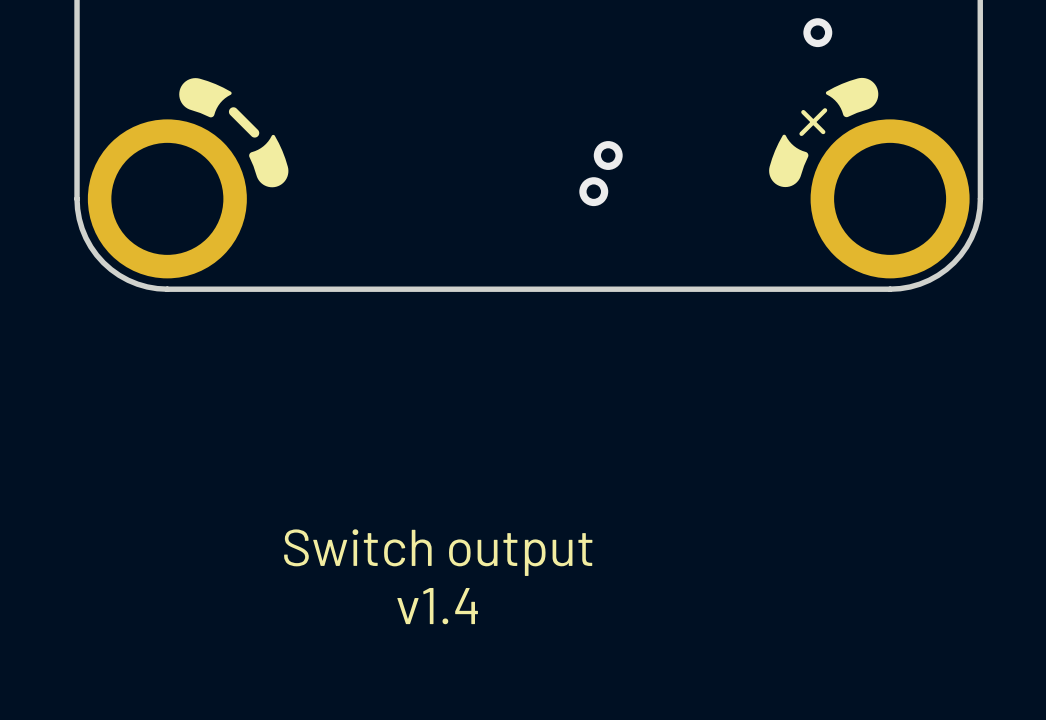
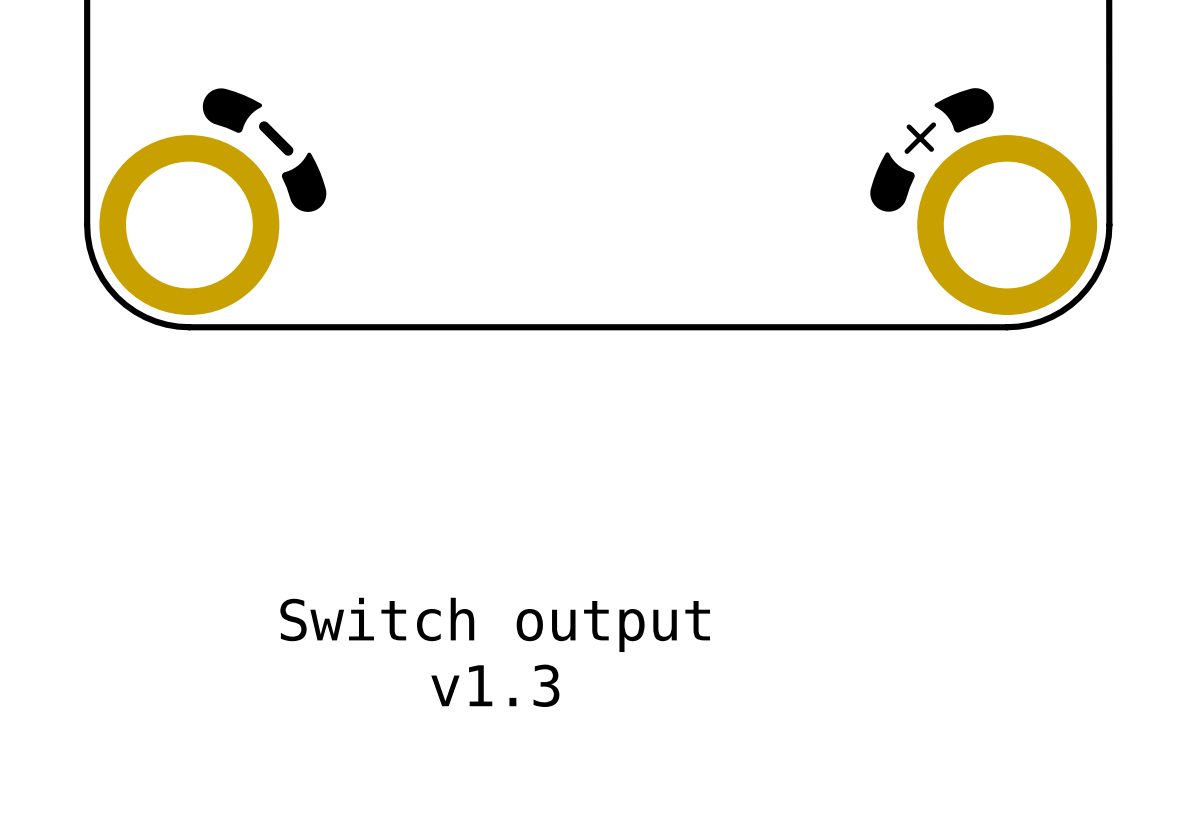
via: (817, 32) -> none
via: (608, 155) -> none
via: (593, 191) -> none
text: v1.4 (437, 606) -> v1.3 (495, 685)

